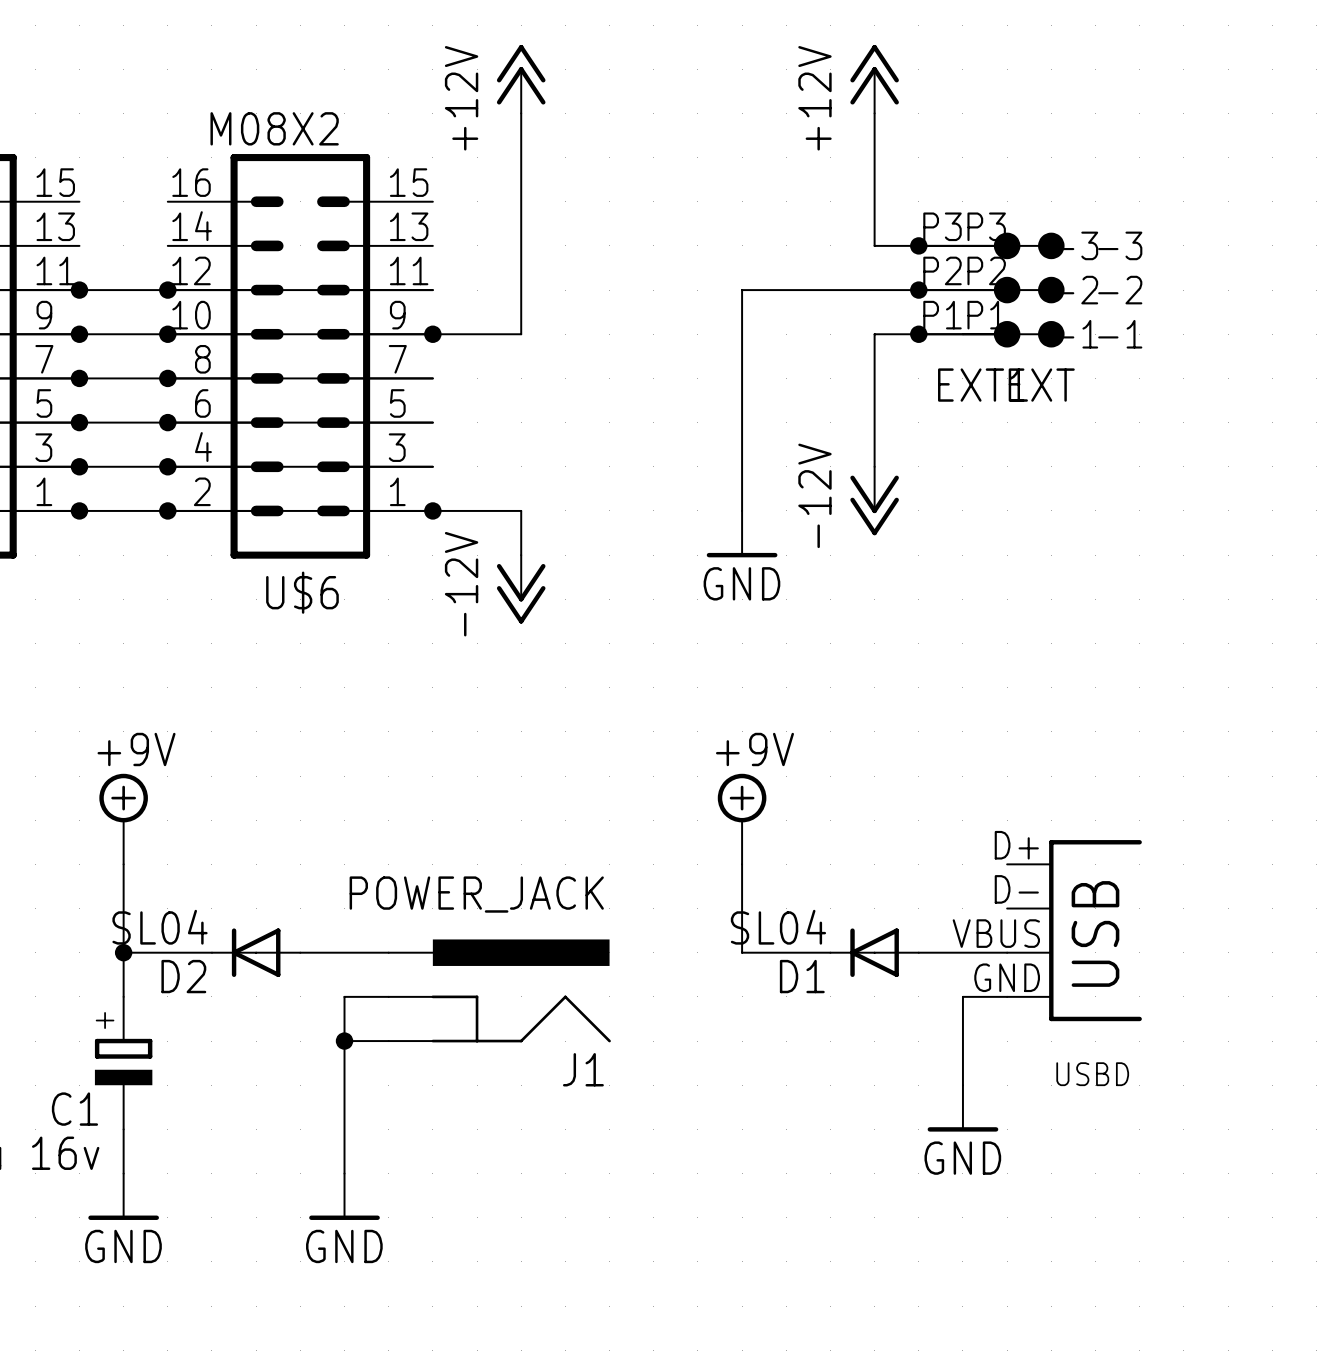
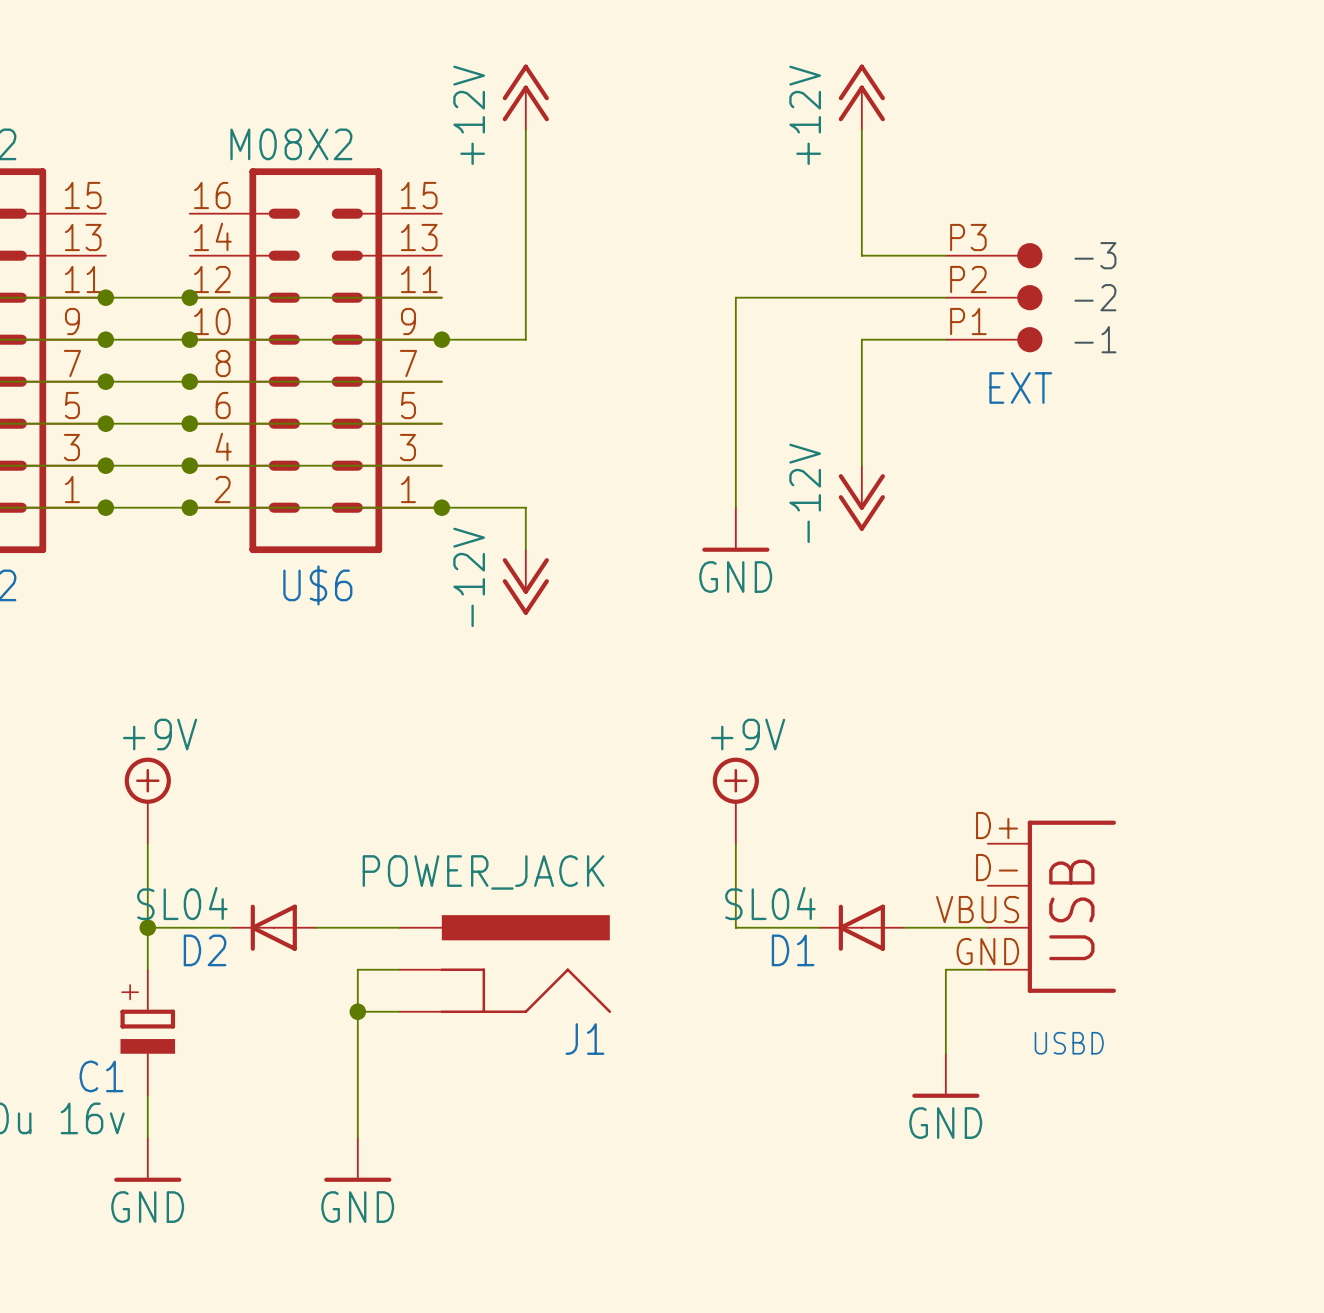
junction: (918, 245) -> none
junction: (918, 290) -> none
EXT1: (969, 290) -> none
junction: (918, 334) -> none

